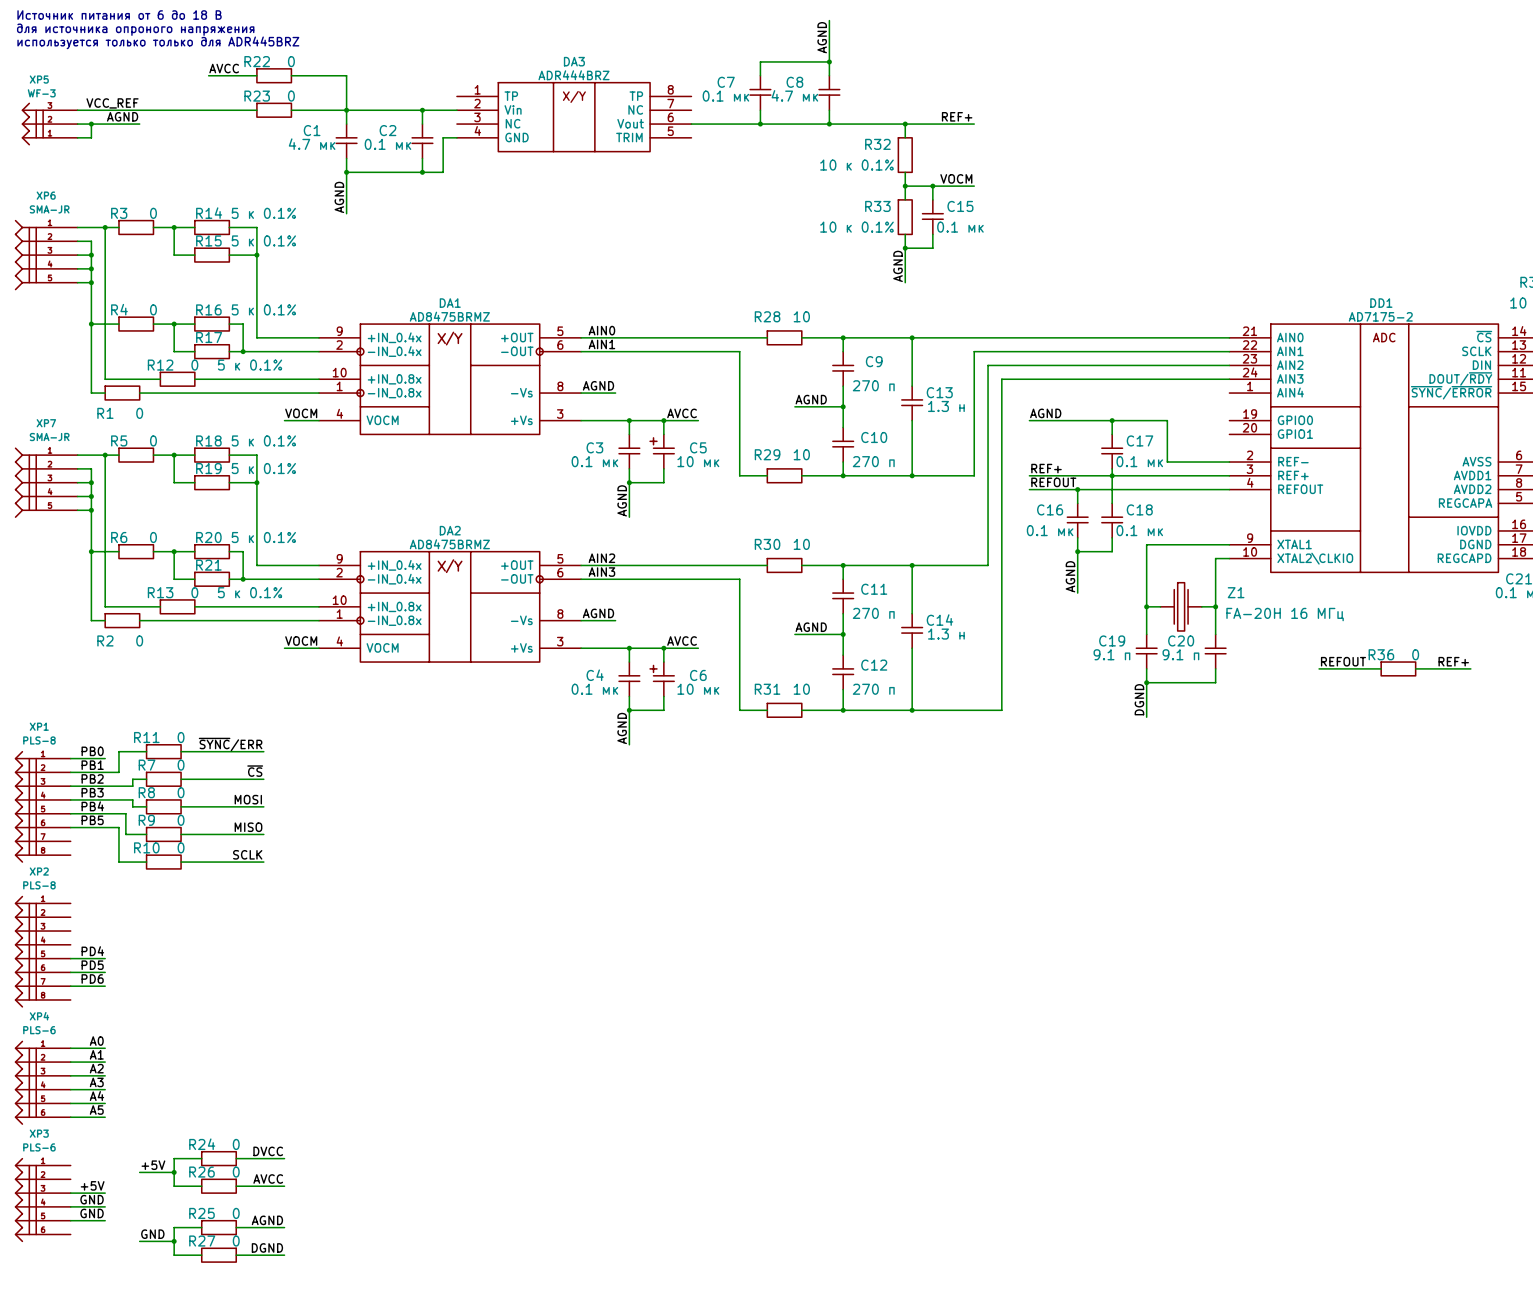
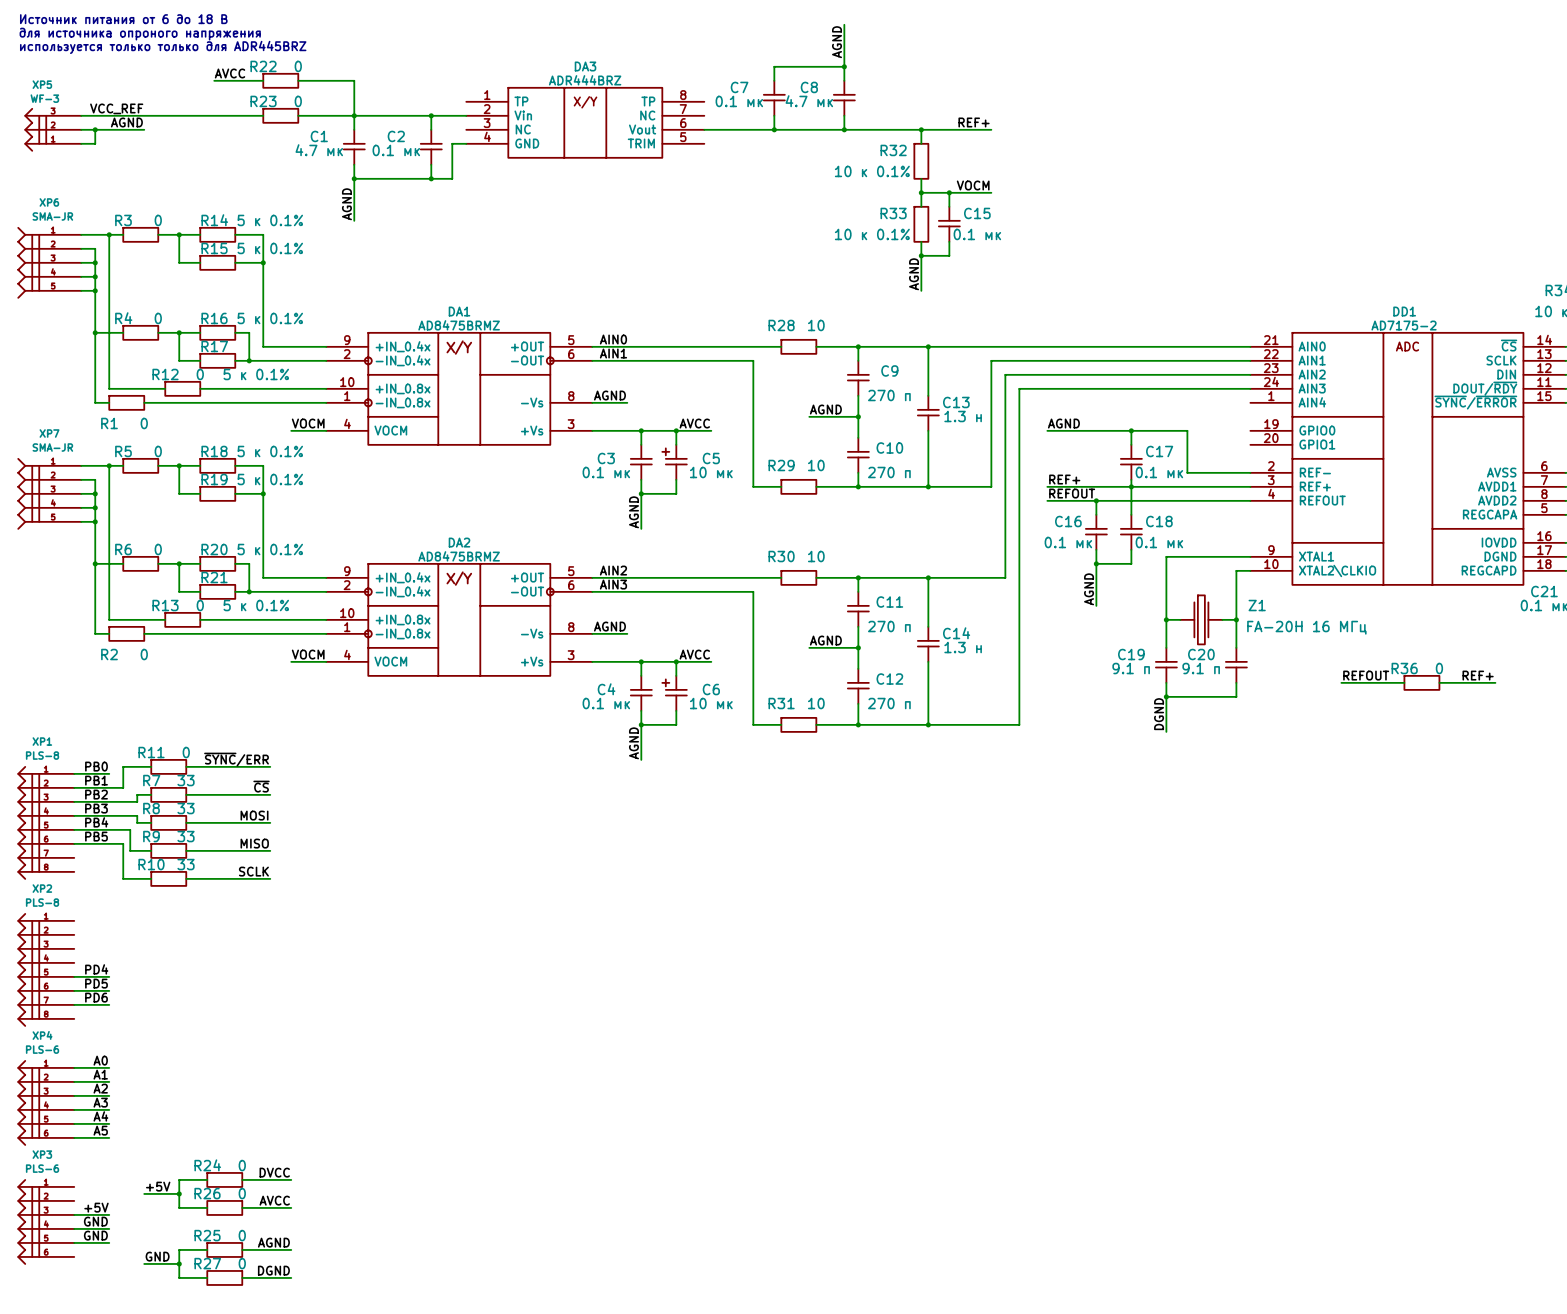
R7 value: 0 (181, 765) -> 33 (186, 780)
R8 value: 0 (181, 792) -> 33 (186, 808)
R9 value: 0 (181, 820) -> 33 (186, 836)
R10 value: 0 (181, 847) -> 33 (186, 864)

